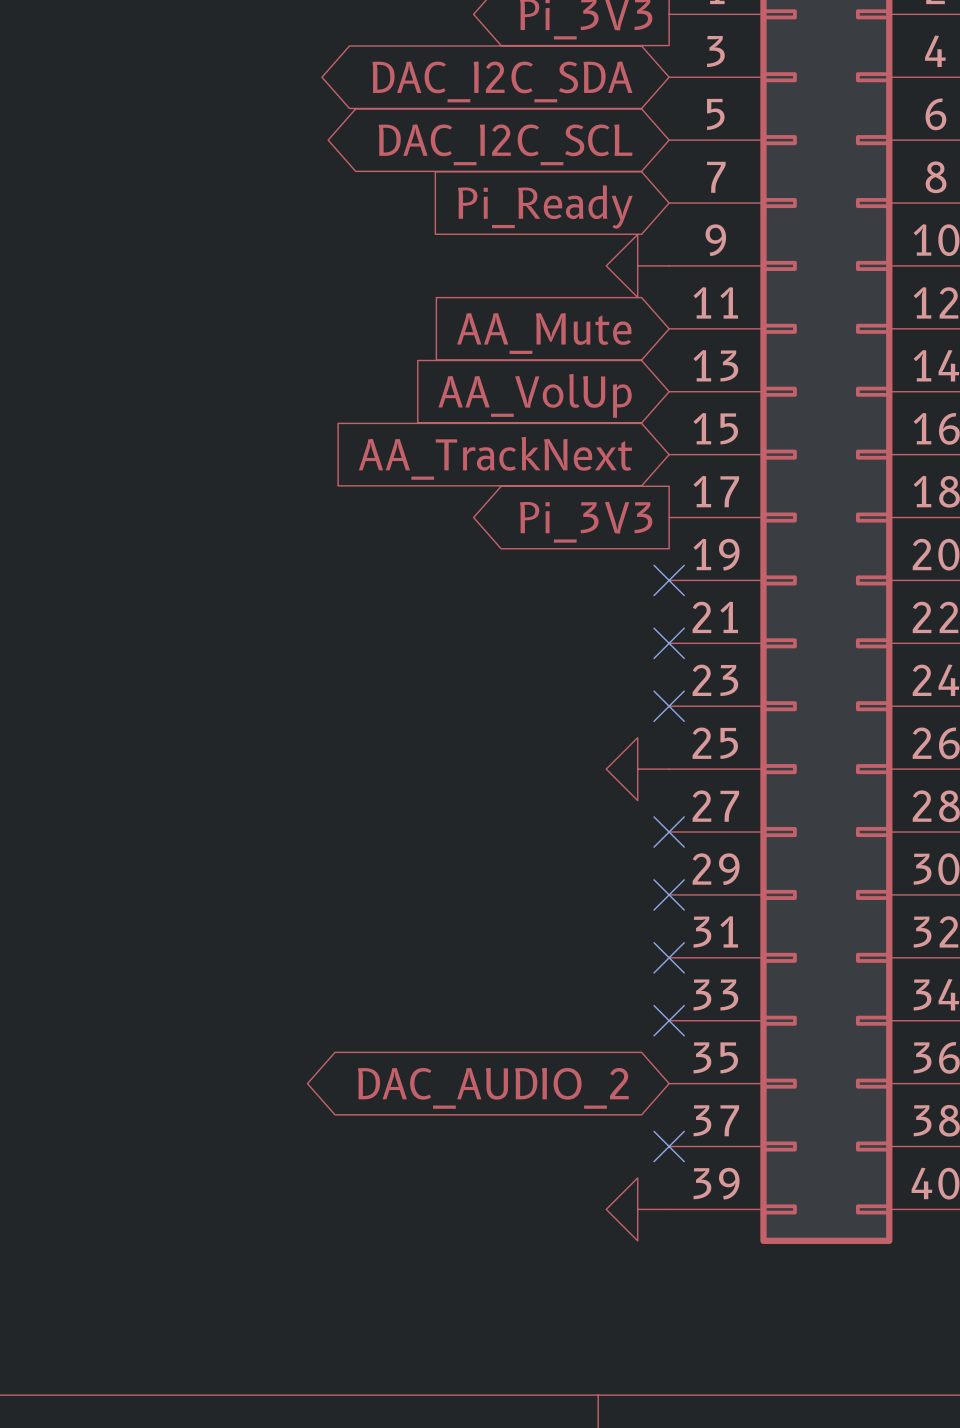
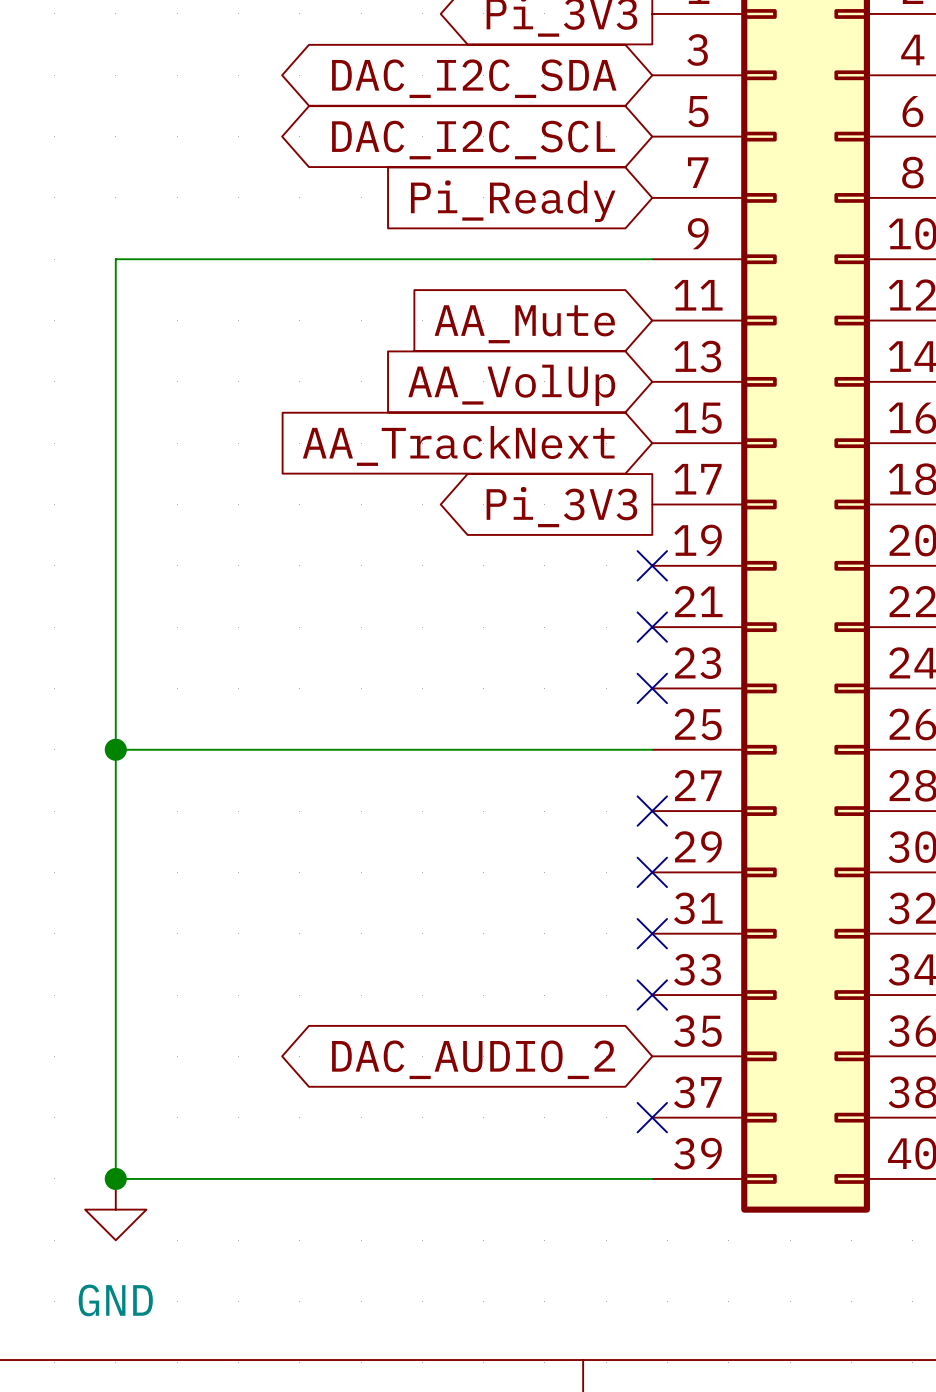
power symbol: (637, 265) -> none
wire: none -> (652, 259) (115, 259) (115, 1178) (652, 1178)
wire: none -> (115, 749) (652, 749)
junction: none -> (115, 749)
power symbol: (637, 769) -> none
junction: none -> (115, 1178)
power symbol: (637, 1209) -> none
power symbol: none -> GND (115, 1209)

